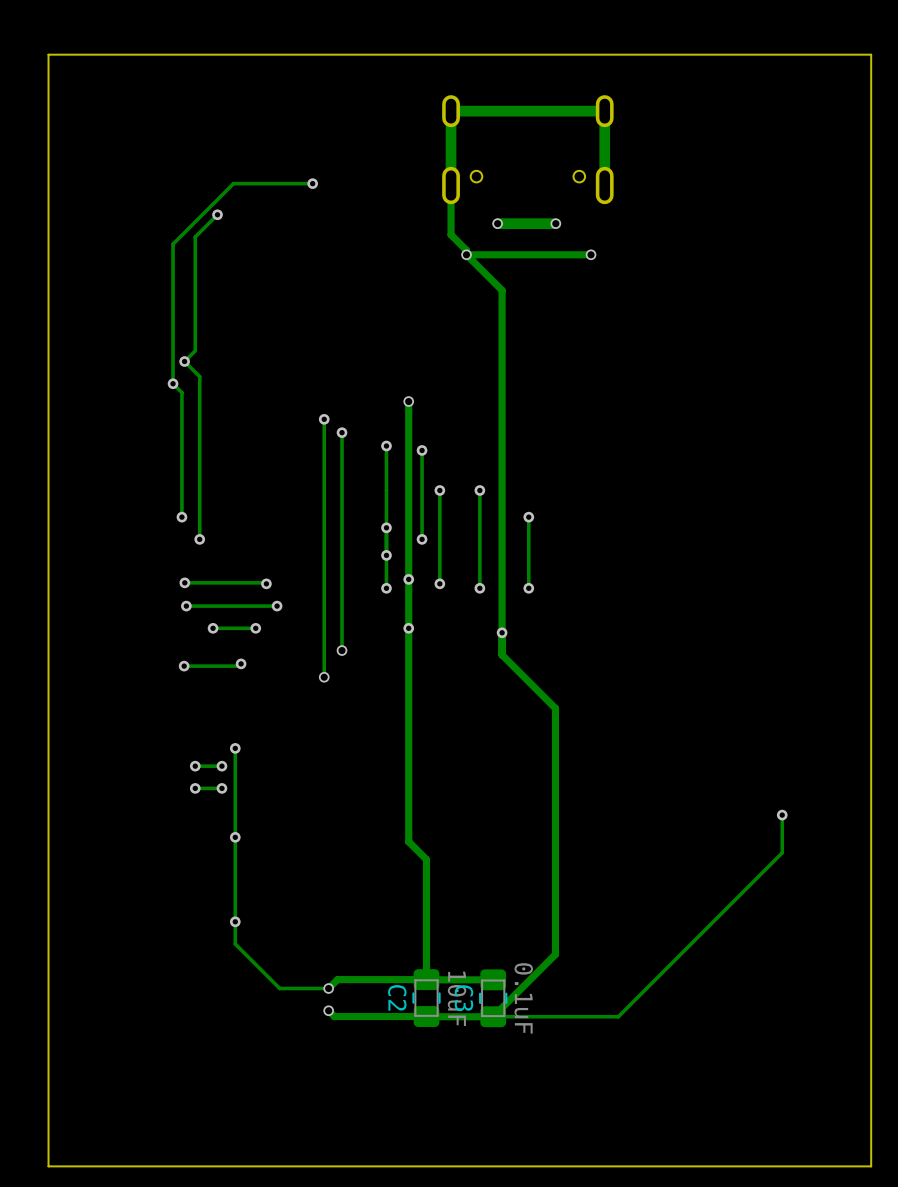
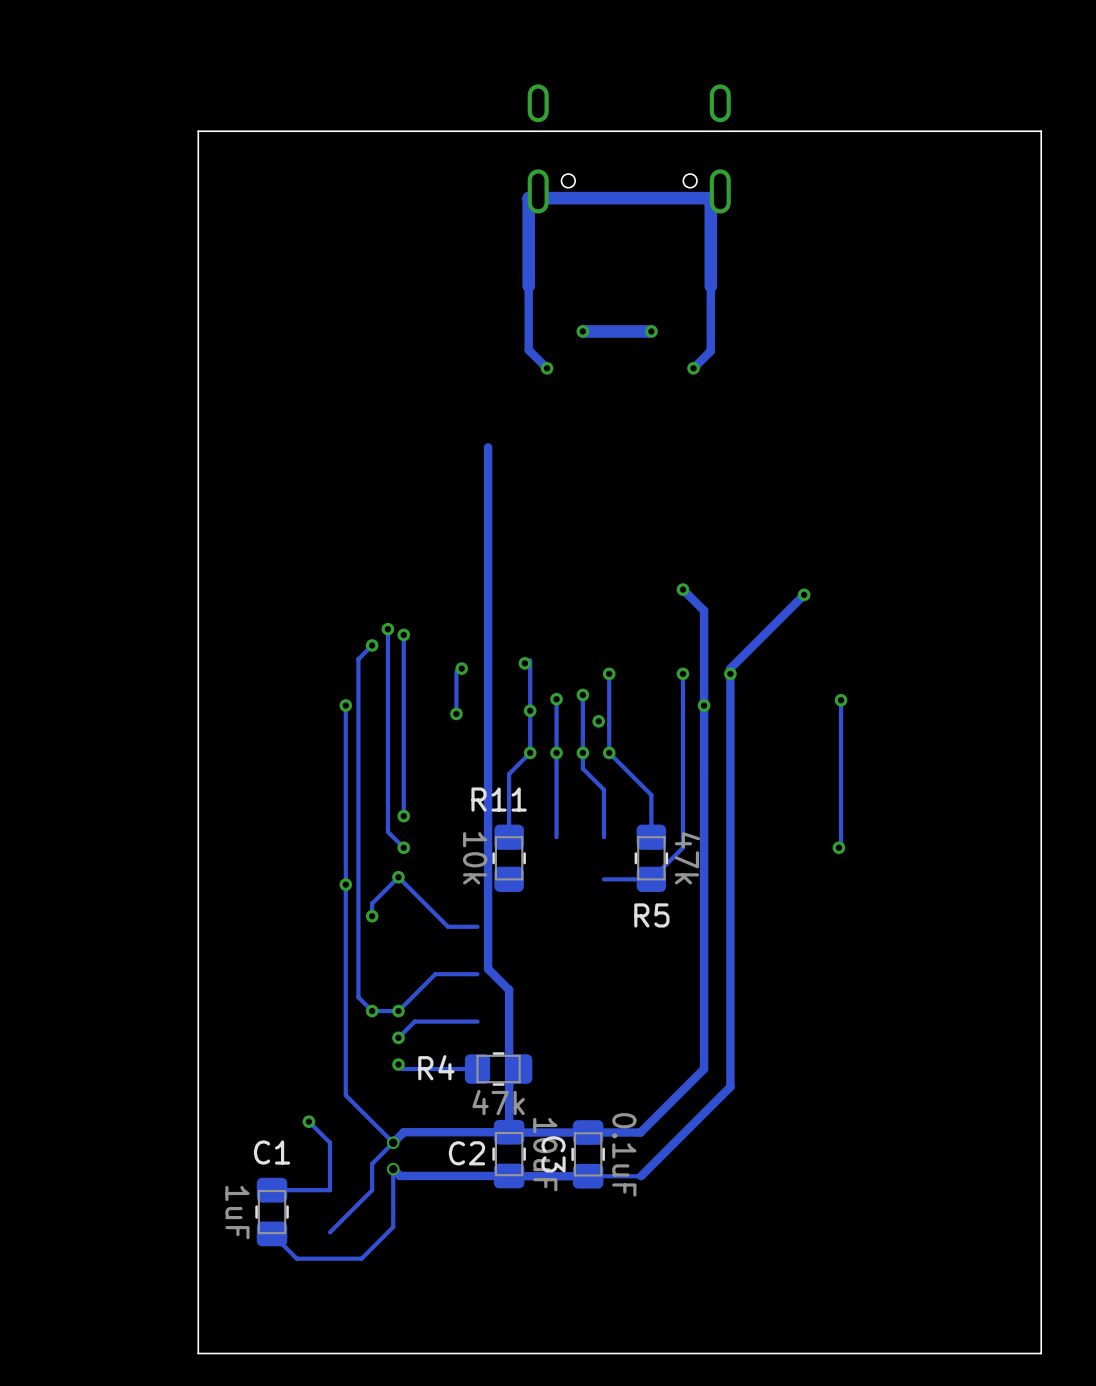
track: (312, 183) (233, 183) (173, 244) (173, 383) (181, 392) (181, 517) -> none
via: (312, 183) -> none
track: (604, 185) (604, 111) (451, 111) (451, 234) (466, 250) (466, 254) -> none
track: (217, 214) (195, 237) (195, 350) (184, 361) (199, 376) (199, 539) -> none
via: (217, 214) -> none
via: (497, 223) -> none
track: (555, 223) (497, 223) -> none
via: (555, 223) -> none
track: (466, 254) (502, 290) (502, 655) (555, 708) (555, 954) (493, 1016) -> none
via: (466, 254) -> none
track: (591, 254) (466, 254) -> none
via: (591, 254) -> none
via: none -> (582, 331)
track: none -> (651, 331) (582, 331)
via: none -> (651, 331)
via: none -> (547, 368)
via: none -> (693, 368)
track: none -> (694, 368) (710, 351) (710, 198) (528, 198) (528, 349) (547, 368)
via: (184, 361) -> none
via: (173, 383) -> none
via: (408, 401) -> none
track: (324, 419) (324, 555) -> none
via: (324, 419) -> none
track: (342, 432) (342, 650) -> none
via: (342, 432) -> none
track: (386, 446) (386, 588) -> none
via: (386, 446) -> none
track: (422, 450) (422, 539) -> none
via: (422, 450) -> none
track: (439, 490) (439, 583) -> none
via: (439, 490) -> none
track: (479, 490) (479, 588) -> none
via: (479, 490) -> none
via: (181, 517) -> none
track: (528, 517) (528, 588) -> none
via: (528, 517) -> none
track: none -> (682, 589) (704, 610) (704, 1069) (640, 1132) (588, 1132)
via: none -> (682, 589)
via: none -> (804, 594)
via: (386, 527) -> none
via: (199, 539) -> none
via: (422, 539) -> none
via: none -> (387, 629)
via: (386, 555) -> none
track: none -> (403, 634) (403, 816)
via: none -> (403, 634)
track: none -> (372, 645) (358, 659) (358, 997) (372, 1011) (398, 1011) (435, 974) (477, 974)
via: none -> (372, 645)
via: (408, 579) -> none
track: none -> (530, 660) (530, 752) (509, 773) (509, 837)
track: (184, 582) (266, 583) -> none
via: (184, 582) -> none
via: (266, 583) -> none
via: (479, 588) -> none
via: (528, 588) -> none
track: none -> (456, 671) (456, 713)
track: none -> (609, 673) (609, 752) (651, 795) (651, 837)
via: none -> (609, 673)
track: none -> (682, 673) (682, 847) (651, 879) (603, 879)
via: none -> (682, 673)
via: none -> (730, 673)
via: (186, 606) -> none
track: (277, 606) (186, 606) -> none
via: (277, 606) -> none
track: none -> (582, 694) (582, 768) (603, 789) (603, 837)
via: none -> (582, 694)
track: none -> (556, 699) (556, 837)
via: none -> (556, 699)
track: none -> (841, 700) (841, 845) (838, 847)
via: none -> (841, 700)
track: none -> (345, 705) (345, 1095) (393, 1142) (372, 1163) (372, 1190) (330, 1232)
via: none -> (345, 705)
via: none -> (704, 705)
via: none -> (530, 710)
via: none -> (456, 713)
via: (213, 628) -> none
track: (255, 628) (213, 628) -> none
via: (255, 628) -> none
via: (408, 628) -> none
via: (342, 650) -> none
via: none -> (530, 752)
via: none -> (556, 752)
via: none -> (582, 752)
via: none -> (609, 752)
track: (241, 663) (238, 666) (184, 666) -> none
via: (241, 663) -> none
via: (184, 666) -> none
track: none -> (387, 773) (387, 831) (403, 847)
via: (324, 677) -> none
via: none -> (403, 816)
via: none -> (403, 847)
via: none -> (838, 847)
track: (235, 748) (235, 944) (279, 988) (328, 988) -> none
via: (235, 748) -> none
R11: none -> 10k (509, 858)
R5: none -> 47k (651, 858)
via: none -> (398, 877)
via: (195, 766) -> none
track: (221, 766) (195, 766) -> none
via: (221, 766) -> none
via: none -> (345, 884)
via: (195, 788) -> none
track: (221, 788) (195, 788) -> none
via: (221, 788) -> none
track: none -> (372, 916) (372, 903) (398, 877) (448, 926) (477, 926)
via: none -> (372, 916)
track: (782, 815) (782, 852) (618, 1016) (537, 1016) -> (804, 594) (730, 668) (730, 1086) (641, 1176)
via: (782, 815) -> none
via: (235, 837) -> none
via: none -> (372, 1011)
via: none -> (398, 1011)
track: none -> (477, 1021) (414, 1021) (398, 1037)
via: none -> (398, 1037)
via: (235, 921) -> none
track: none -> (398, 1064) (402, 1069) (477, 1069)
via: none -> (398, 1064)
R4: none -> 47k (498, 1069)
track: none -> (308, 1121) (330, 1142) (330, 1190) (272, 1190)
via: none -> (308, 1121)
C2 name rotation: 0° (397, 997) -> 90° counterclockwise (466, 1153)
track: none -> (393, 1169) (393, 1227) (361, 1258) (296, 1258) (272, 1233)
C1: none -> 1uF (272, 1212)
board edge: (871, 1166) (871, 54) (48, 54) (48, 1166) (164, 1166) -> (1035, 1353) (1041, 1353) (1041, 131) (198, 131) (198, 1353)

